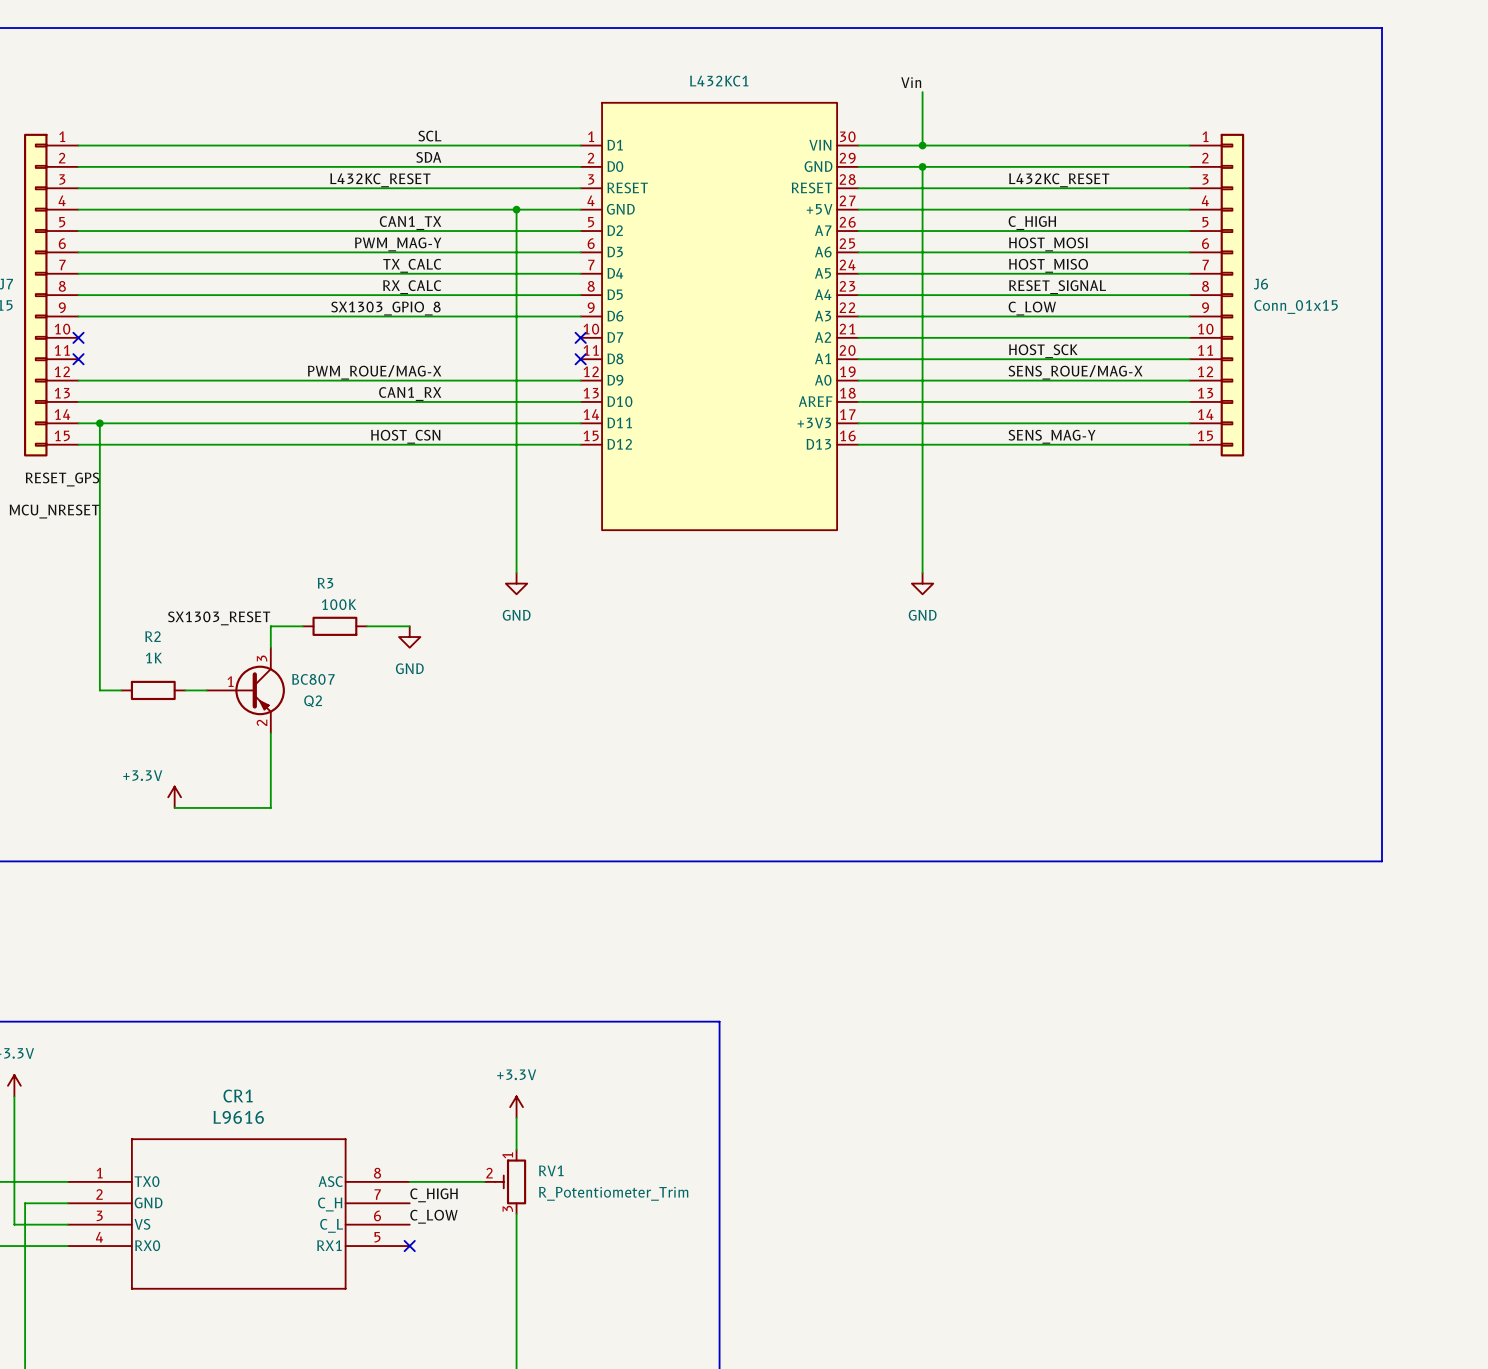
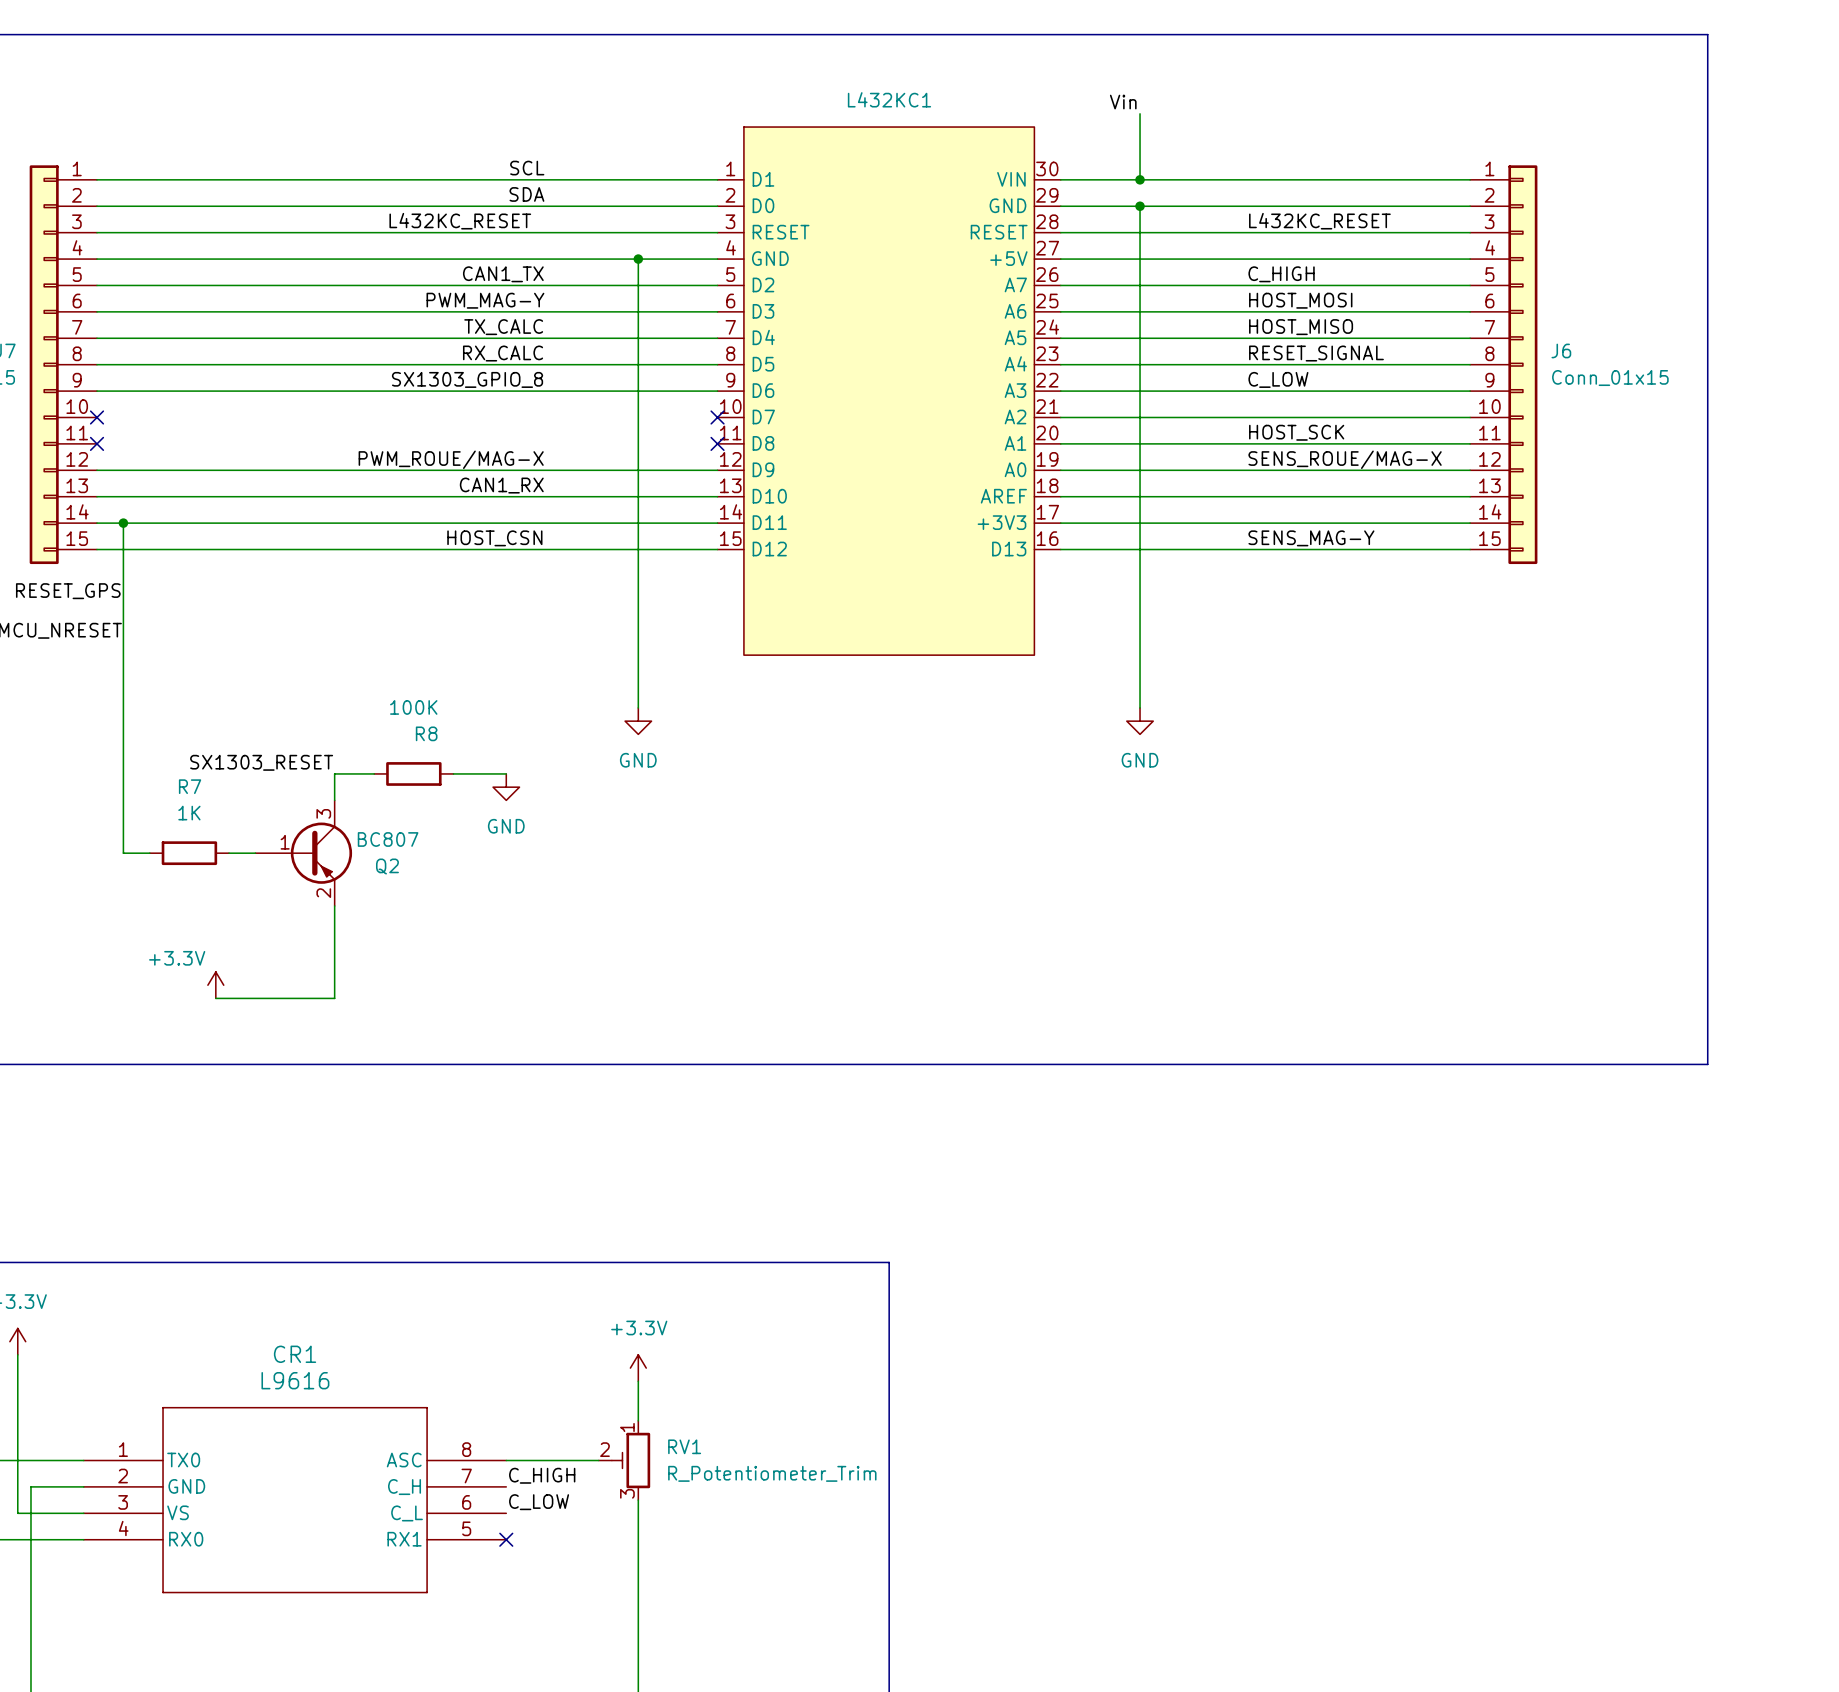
R3 name: R3 (325, 583) -> R8 (426, 733)
R3 value position: 100K (339, 604) -> 100K (413, 707)
R2 name: R2 (152, 636) -> R7 (190, 786)

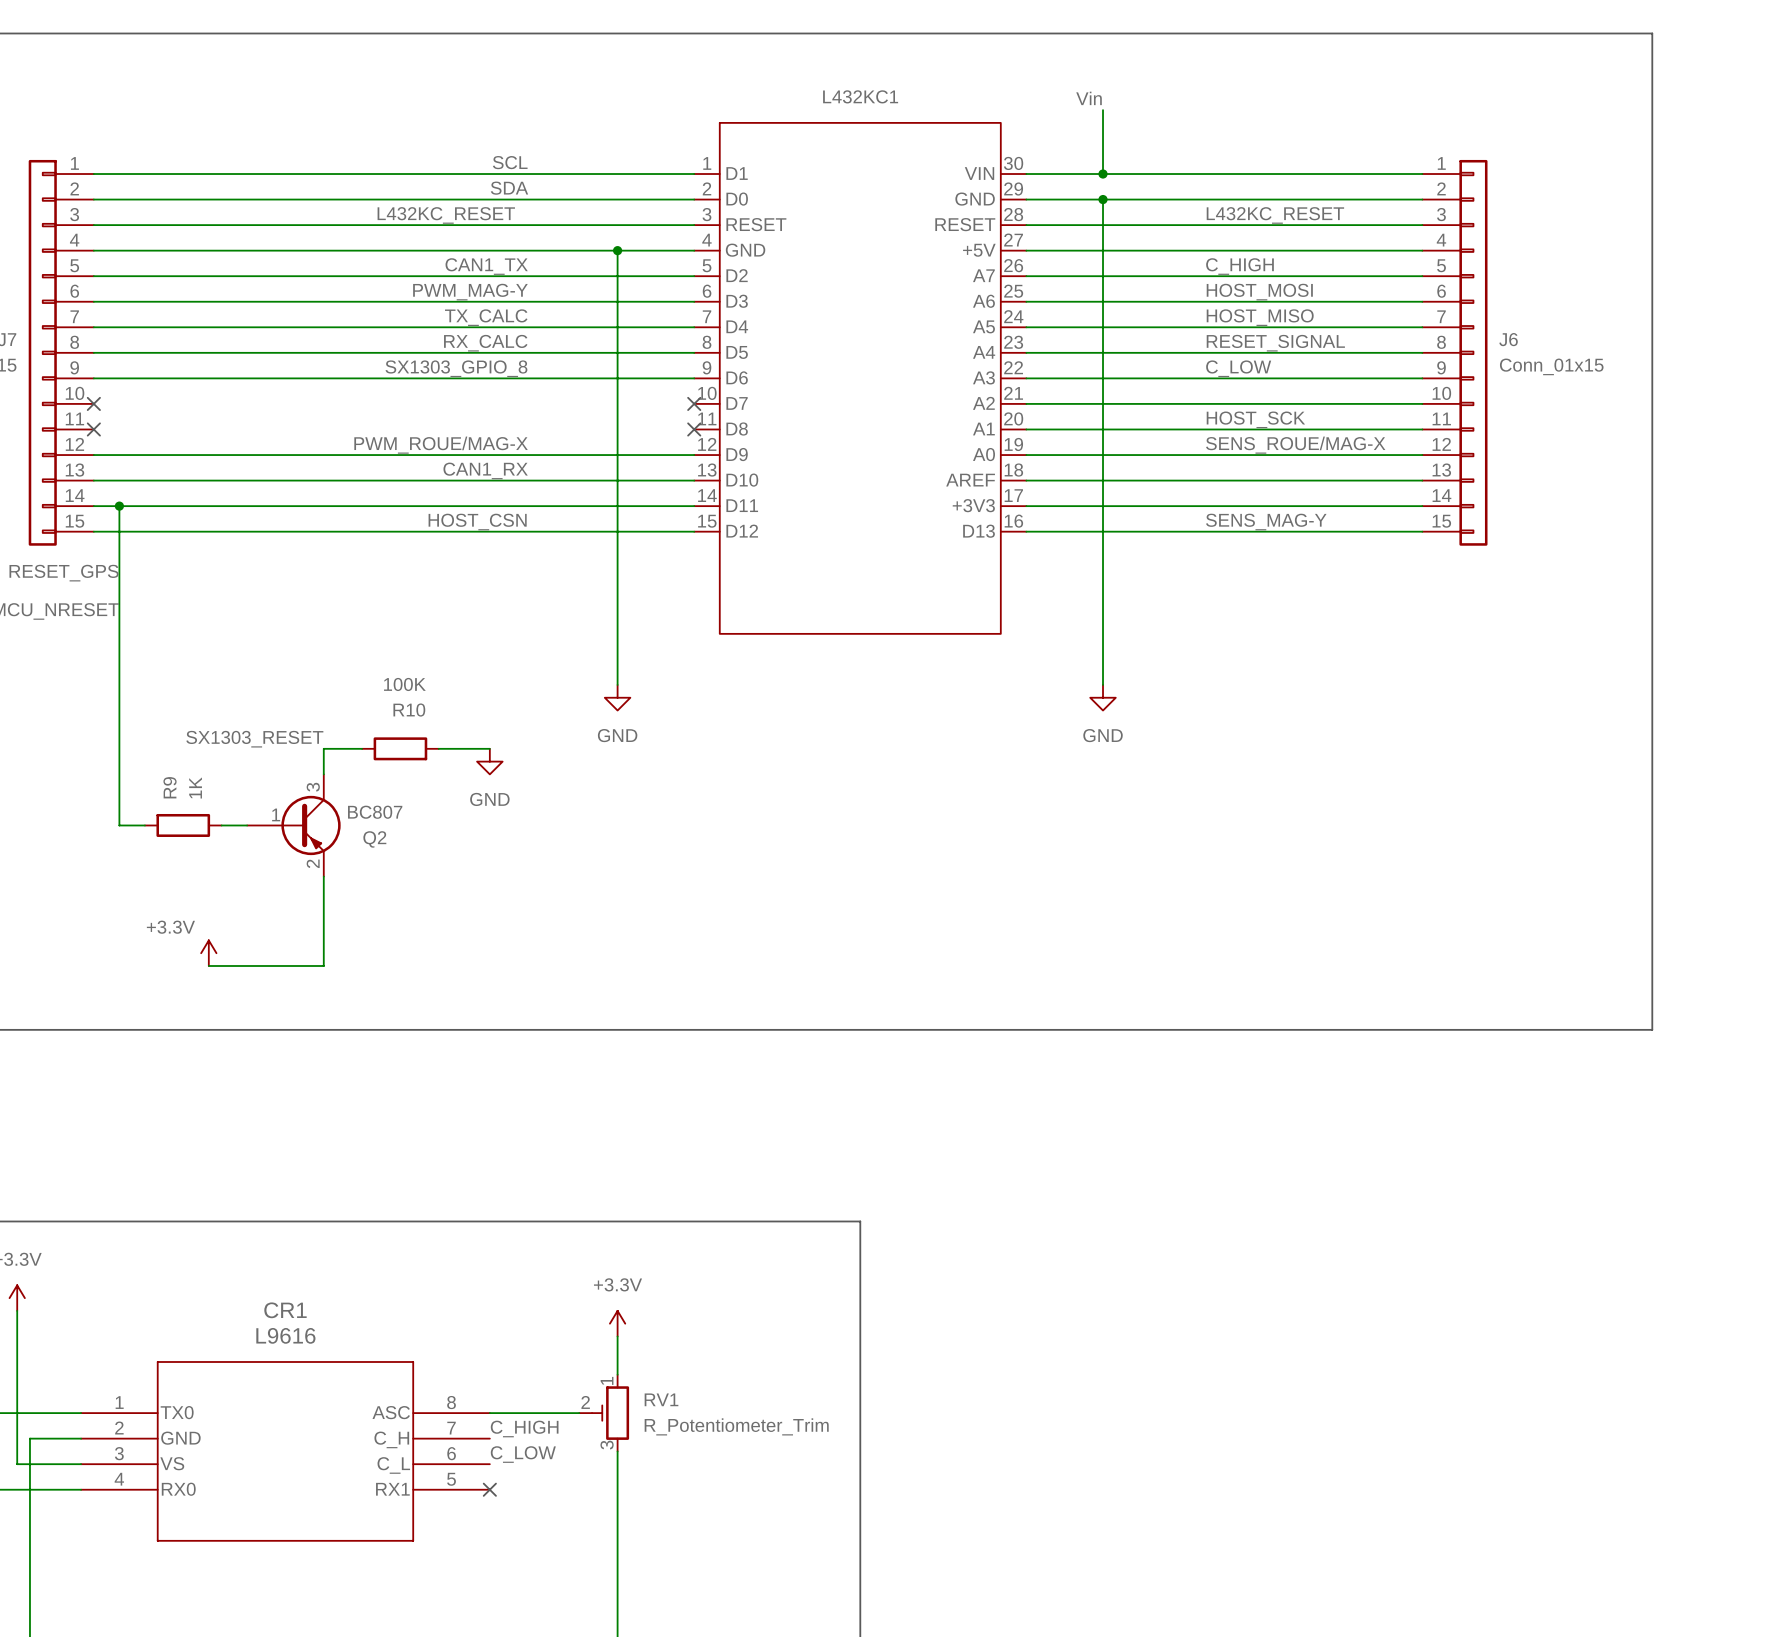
R8 name: R8 (426, 733) -> R10 (409, 710)
R7 name: R7 (190, 786) -> R9 (170, 787)
R7 value rotation: 0° (189, 813) -> 90° counterclockwise (195, 787)

